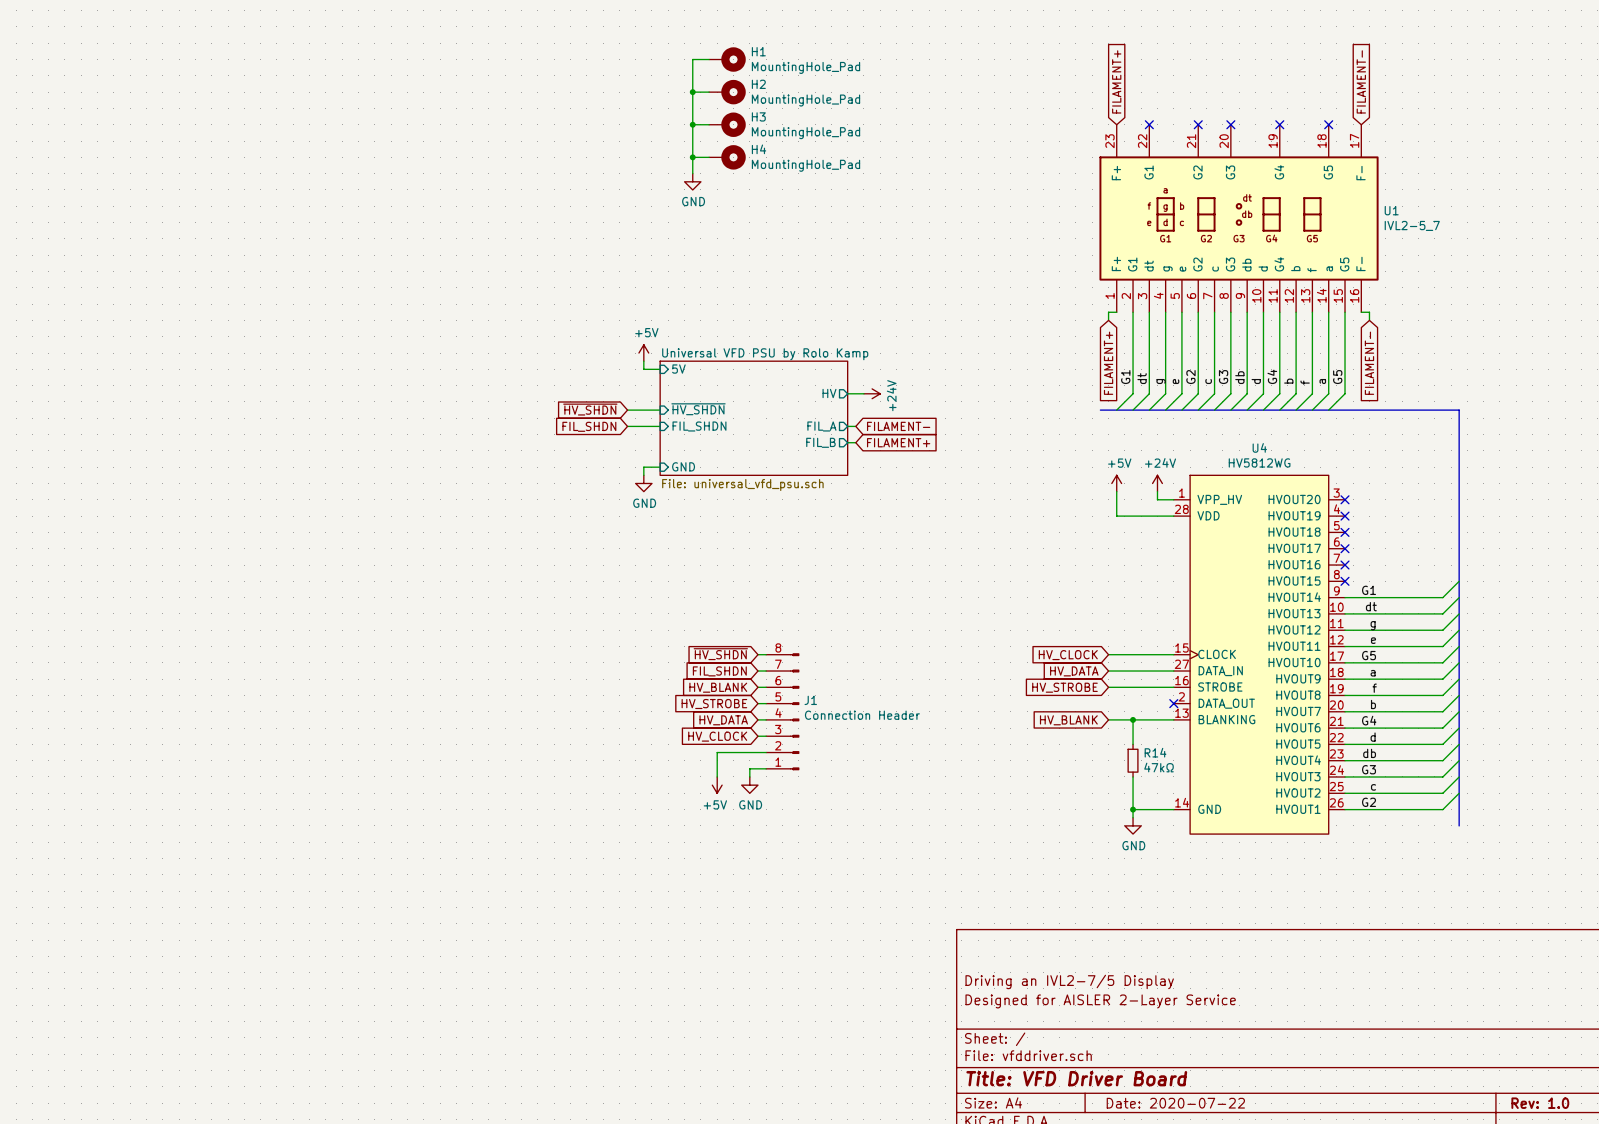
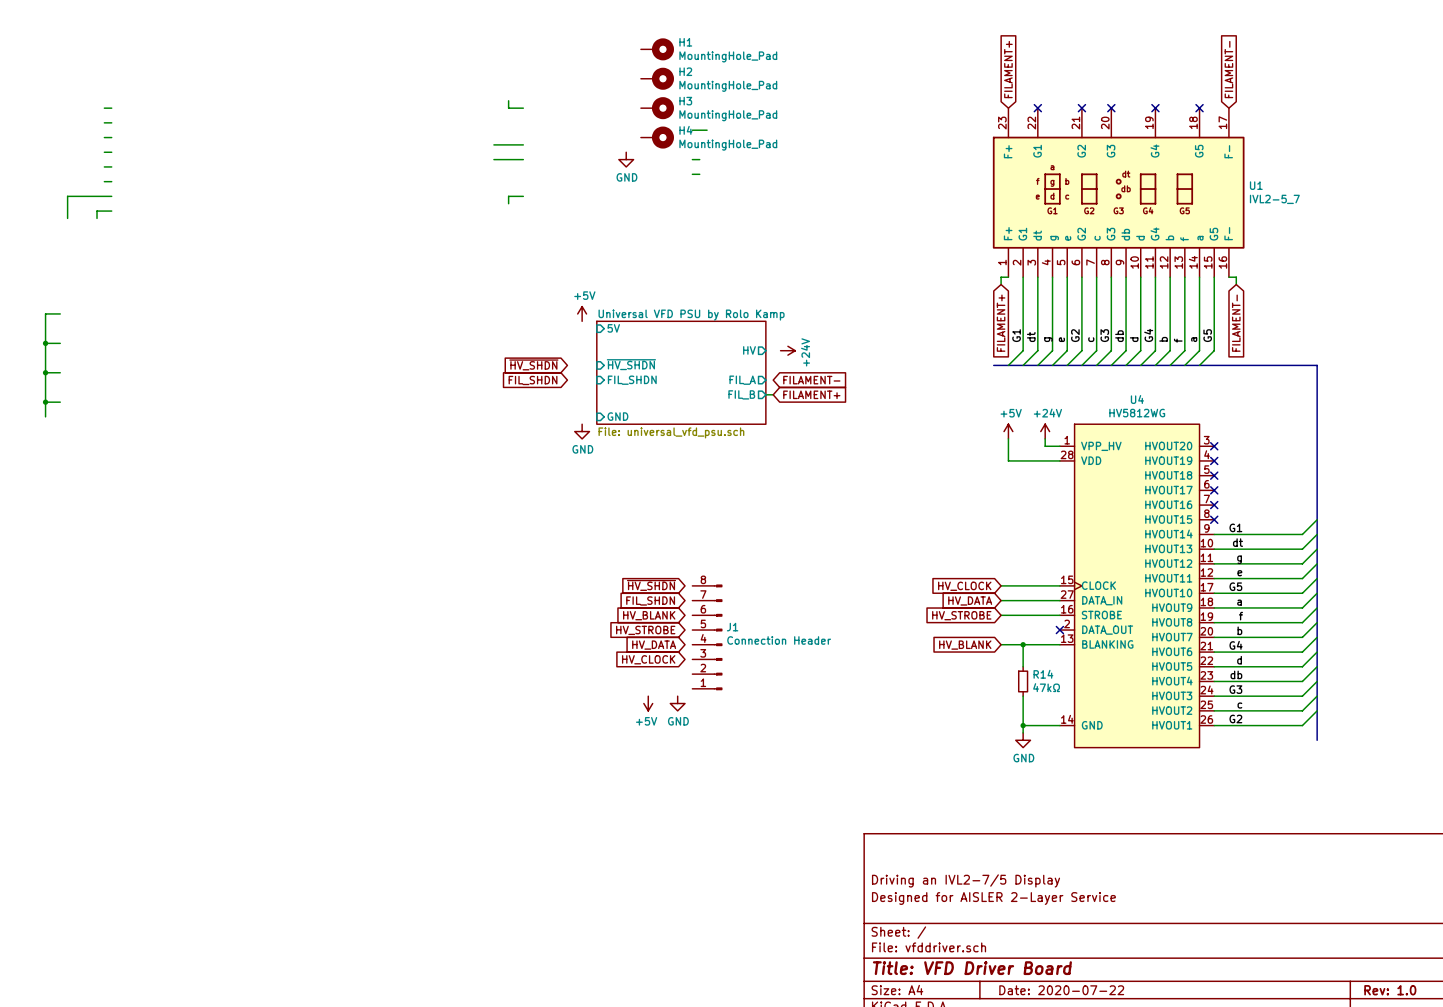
wire: (709, 59) (692, 59) (692, 173) -> none
wire: (692, 92) (709, 92) -> none
junction: (692, 92) -> none
wire: none -> (508, 100) (508, 108) (523, 108)
wire: none -> (104, 108) (111, 108)
wire: (692, 124) (709, 124) -> none
junction: (692, 124) -> none
wire: none -> (104, 122) (111, 122)
wire: none -> (104, 137) (111, 137)
wire: (692, 157) (709, 157) -> (692, 130) (707, 130)
junction: (692, 157) -> none
wire: none -> (493, 144) (523, 144)
wire: none -> (104, 152) (111, 152)
wire: none -> (493, 159) (523, 159)
wire: none -> (692, 159) (699, 159)
wire: none -> (104, 166) (111, 166)
wire: none -> (692, 174) (699, 174)
wire: none -> (104, 181) (111, 181)
wire: none -> (111, 196) (67, 196) (67, 218)
wire: none -> (523, 196) (508, 196) (508, 203)
wire: none -> (111, 211) (97, 211) (97, 218)
wire: none -> (60, 313) (45, 313) (45, 416)
wire: (643, 361) (643, 369) (660, 369) -> none
wire: none -> (45, 343) (60, 343)
junction: none -> (45, 343)
wire: (847, 393) (863, 393) -> none
wire: (627, 410) (660, 410) -> none
wire: none -> (45, 372) (60, 372)
junction: none -> (45, 372)
wire: (627, 426) (660, 426) -> none
wire: (847, 426) (855, 426) -> none
wire: none -> (45, 402) (60, 402)
junction: none -> (45, 402)
wire: (660, 467) (643, 467) (643, 475) -> none
wire: (757, 654) (766, 654) -> none
wire: (757, 671) (766, 671) -> none
wire: (757, 687) (766, 687) -> none
wire: (757, 703) (766, 703) -> none
wire: (757, 719) (766, 719) -> none
wire: (757, 736) (766, 736) -> none
wire: (766, 752) (717, 752) (717, 776) -> none
wire: (766, 768) (749, 768) (749, 776) -> none

